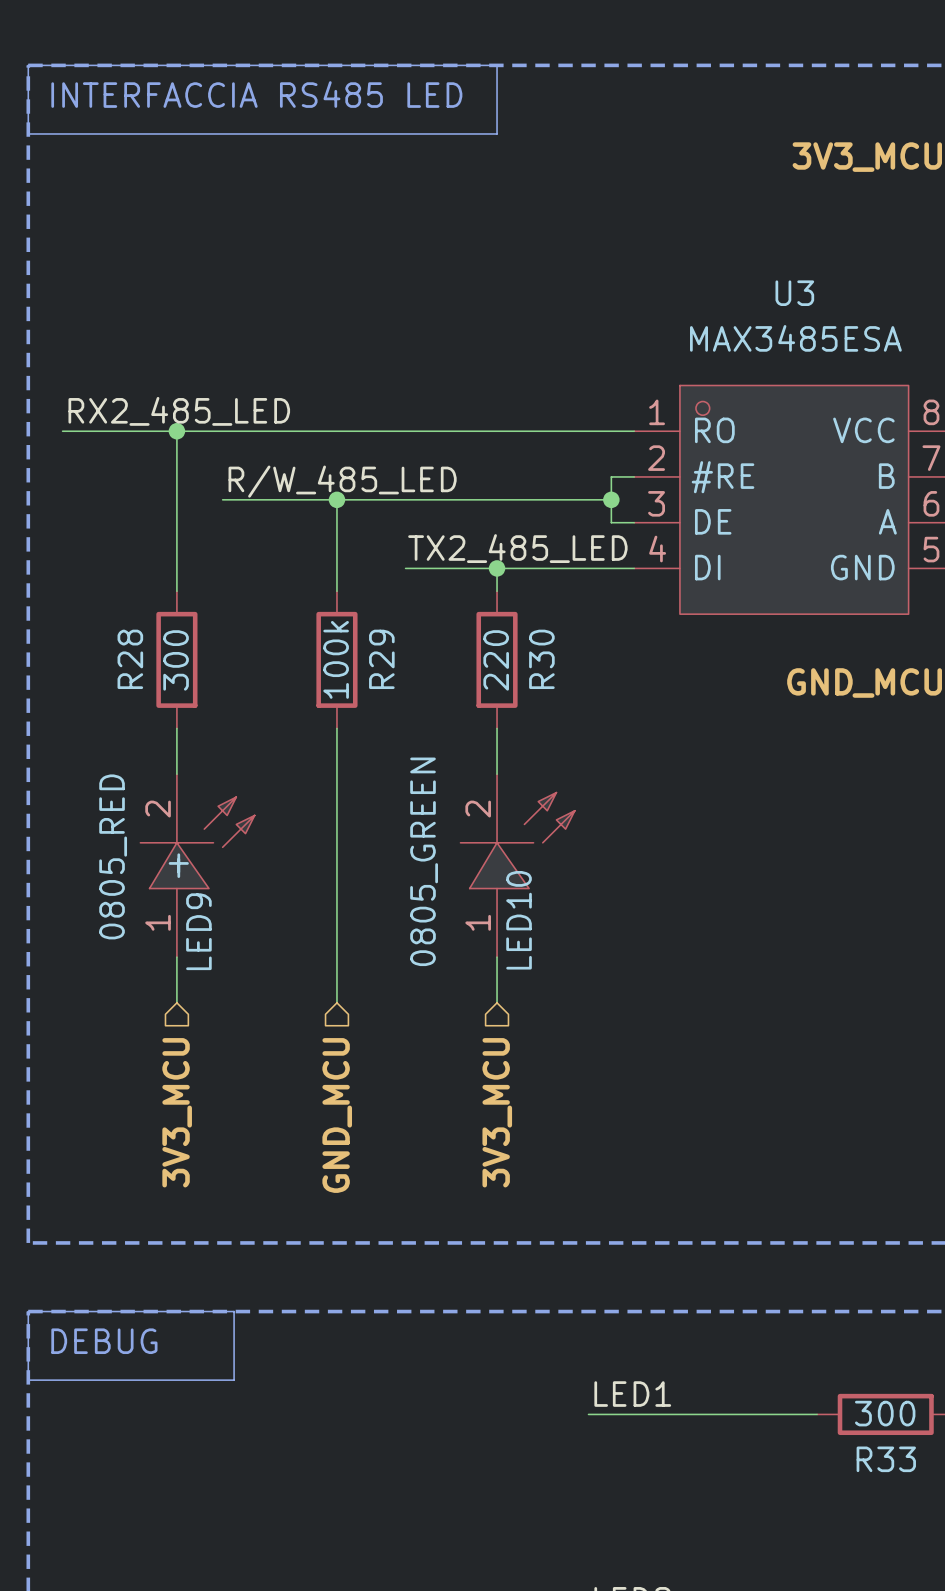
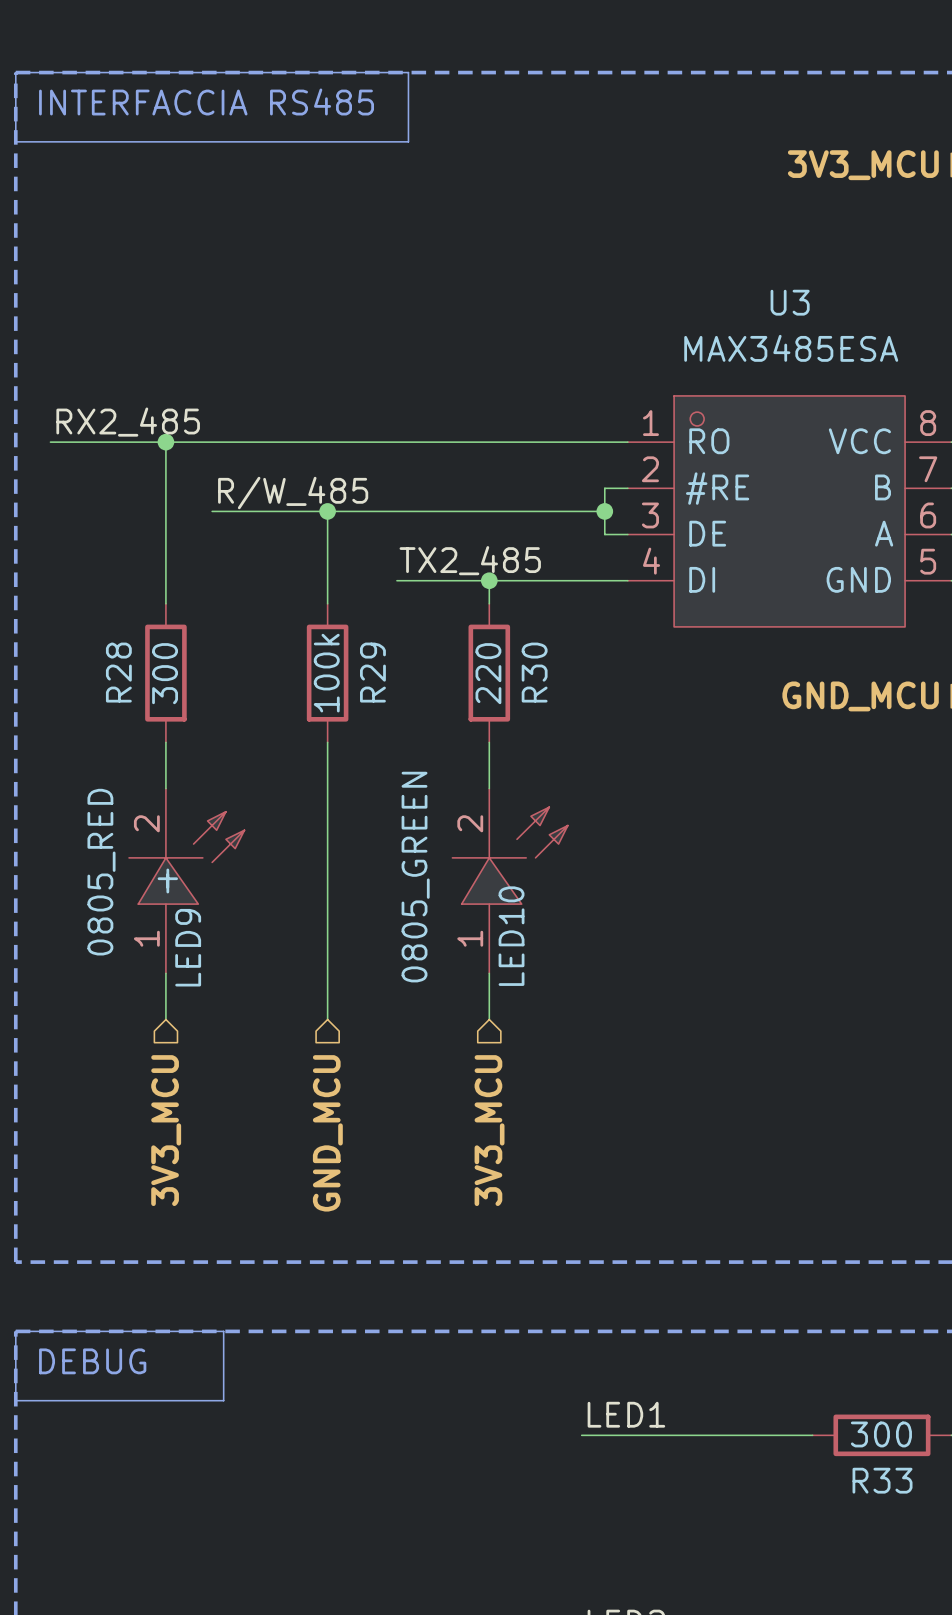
line: (417, 65) (497, 65) (497, 133) (417, 133) -> (408, 72) (408, 141)
text: INTERFACCIA RS485 LED (256, 94) -> INTERFACCIA RS485 (206, 101)
label: RX2_485_LED (179, 411) -> RX2_485 (128, 422)
label: R/W_485_LED (342, 481) -> R/W_485 (293, 493)
label: TX2_485_LED (517, 548) -> TX2_485 (470, 560)

